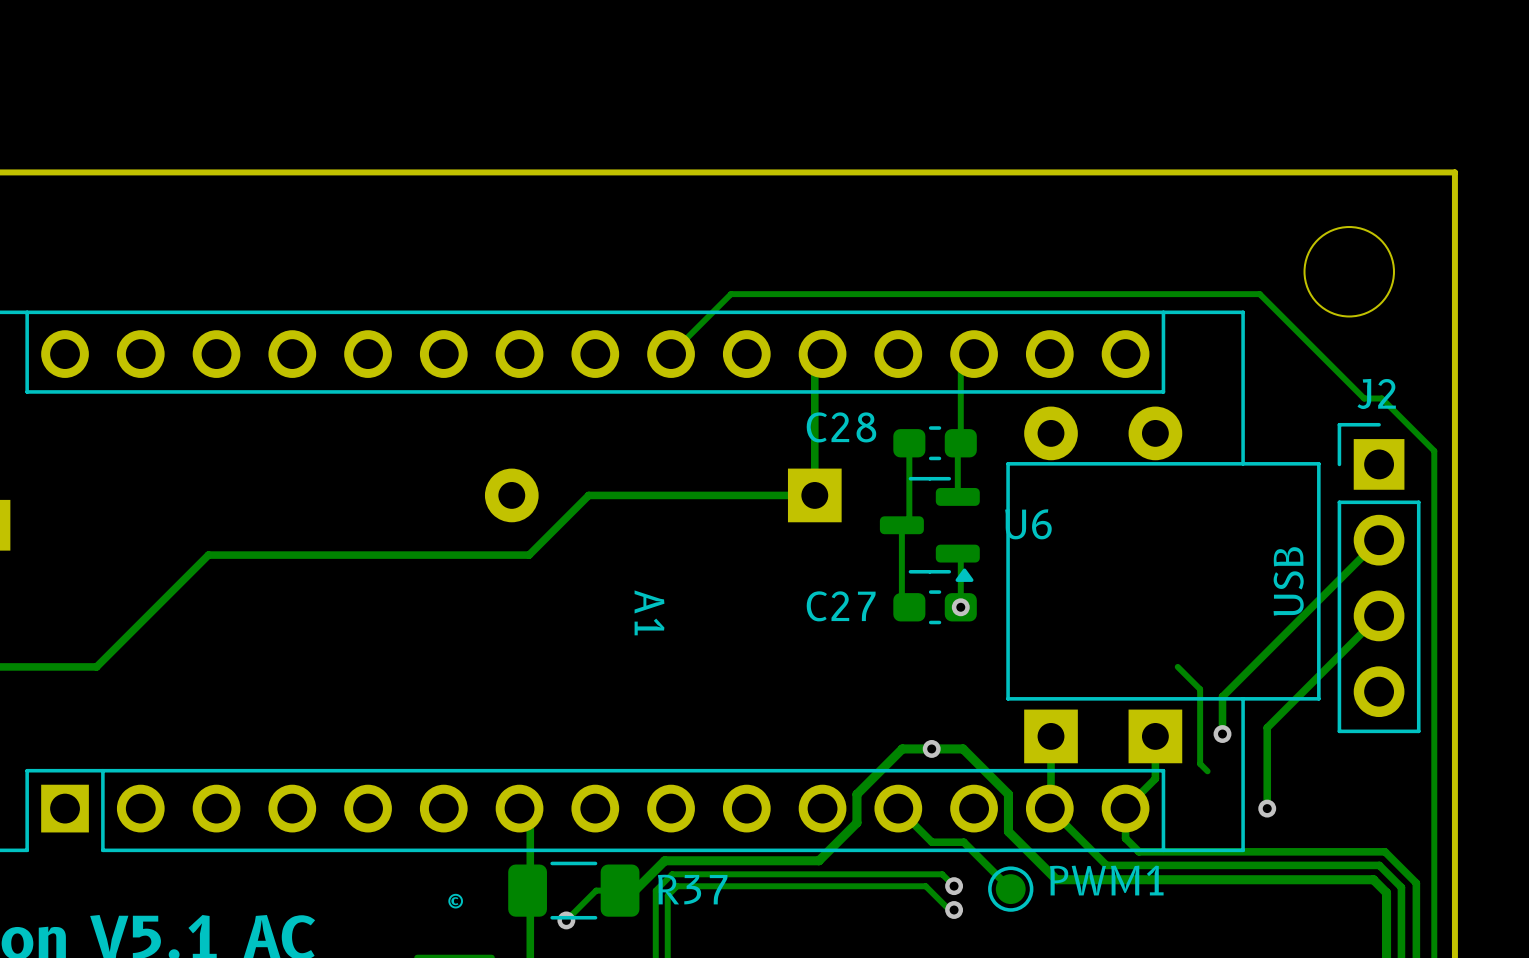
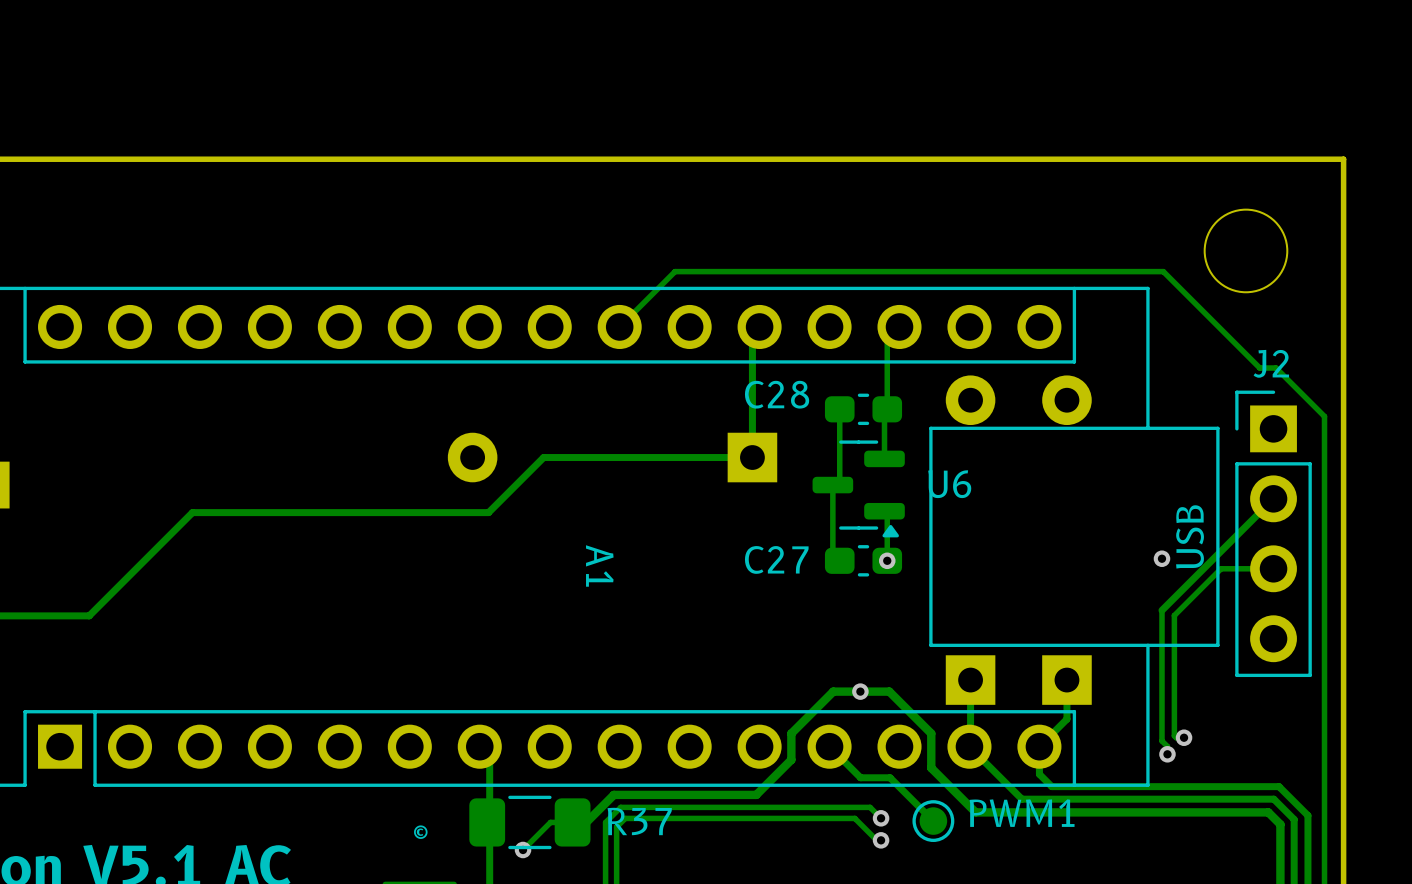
via: none -> (1161, 558)
track: (1379, 615) (1267, 727) (1267, 808) -> (1273, 568) (1221, 568) (1174, 615) (1174, 735) (1184, 737)
track: (1258, 660) (1222, 696) (1222, 734) -> (1161, 610) (1161, 741) (1167, 746) (1167, 754)
track: (1177, 666) (1200, 689) (1200, 763) (1207, 771) -> none
via: (1222, 734) -> none
via: none -> (1184, 737)
via: (1267, 808) -> none
via: none -> (1167, 754)

